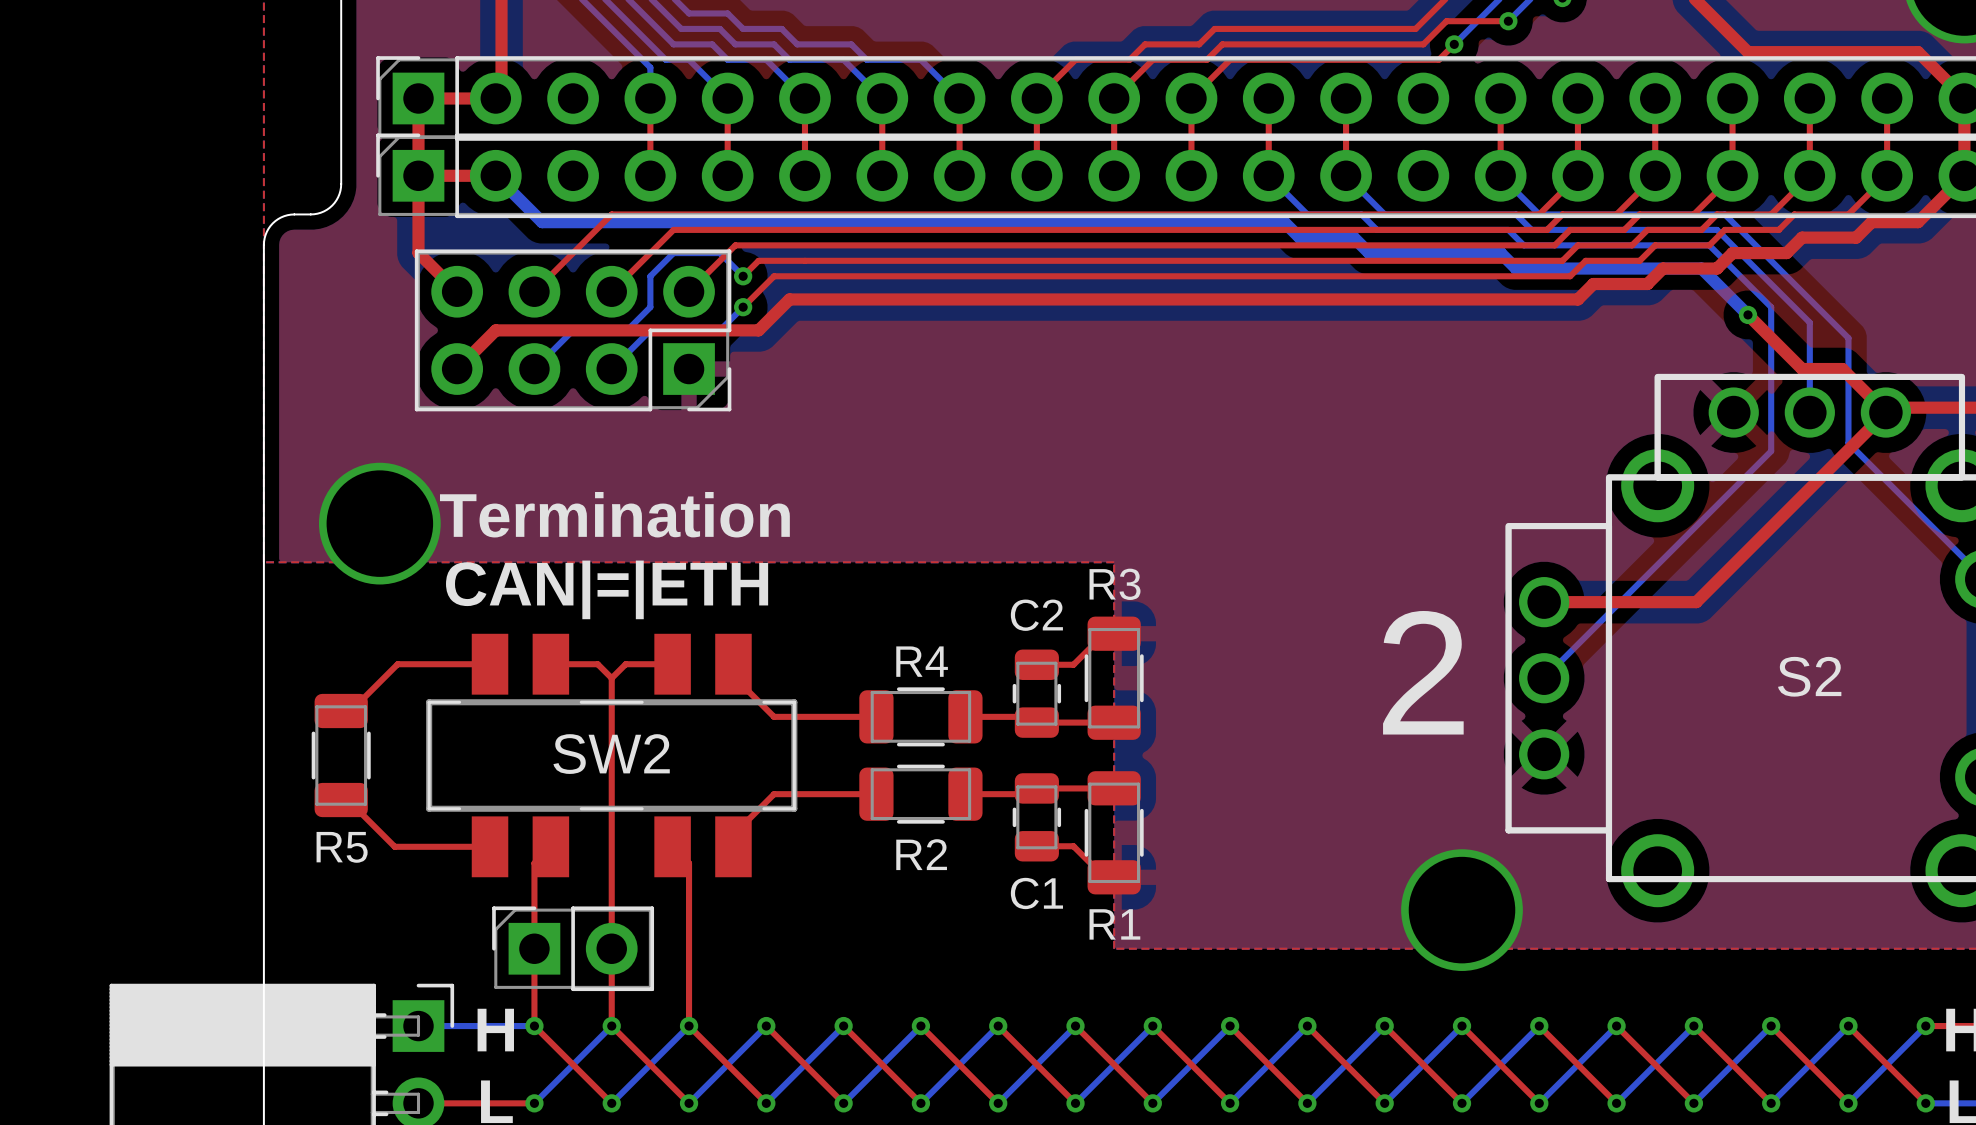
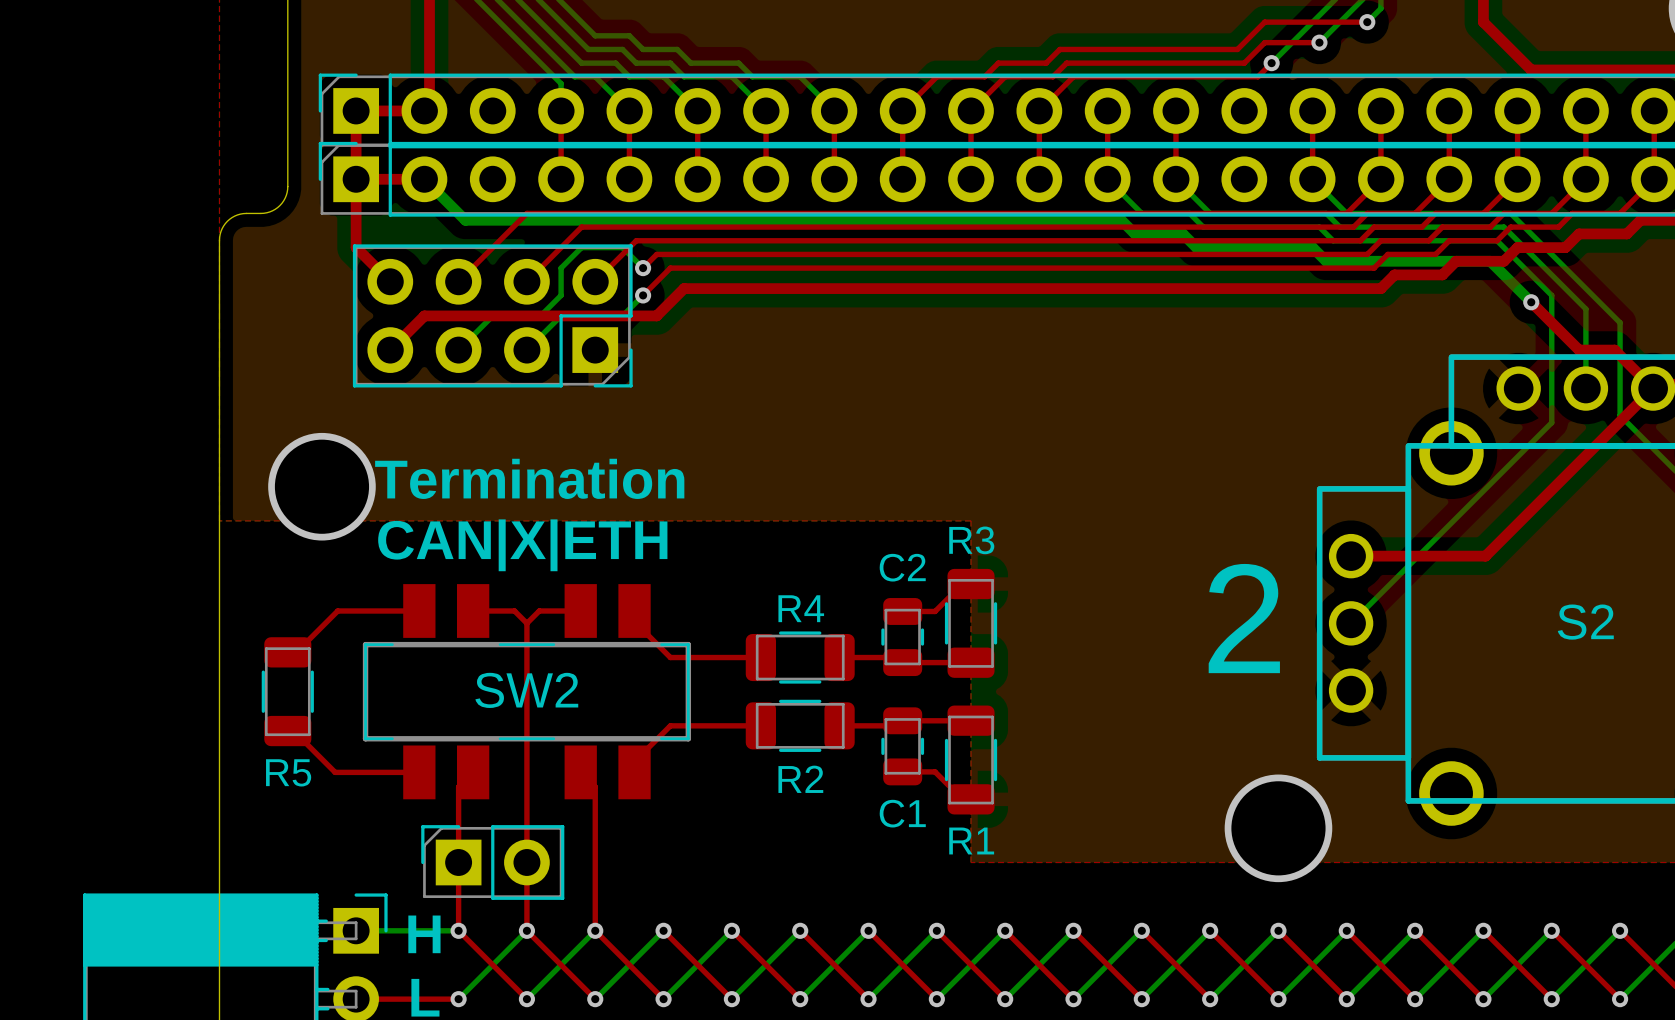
text: CAN|=|ETH (607, 589) -> CAN|X|ETH (522, 545)

